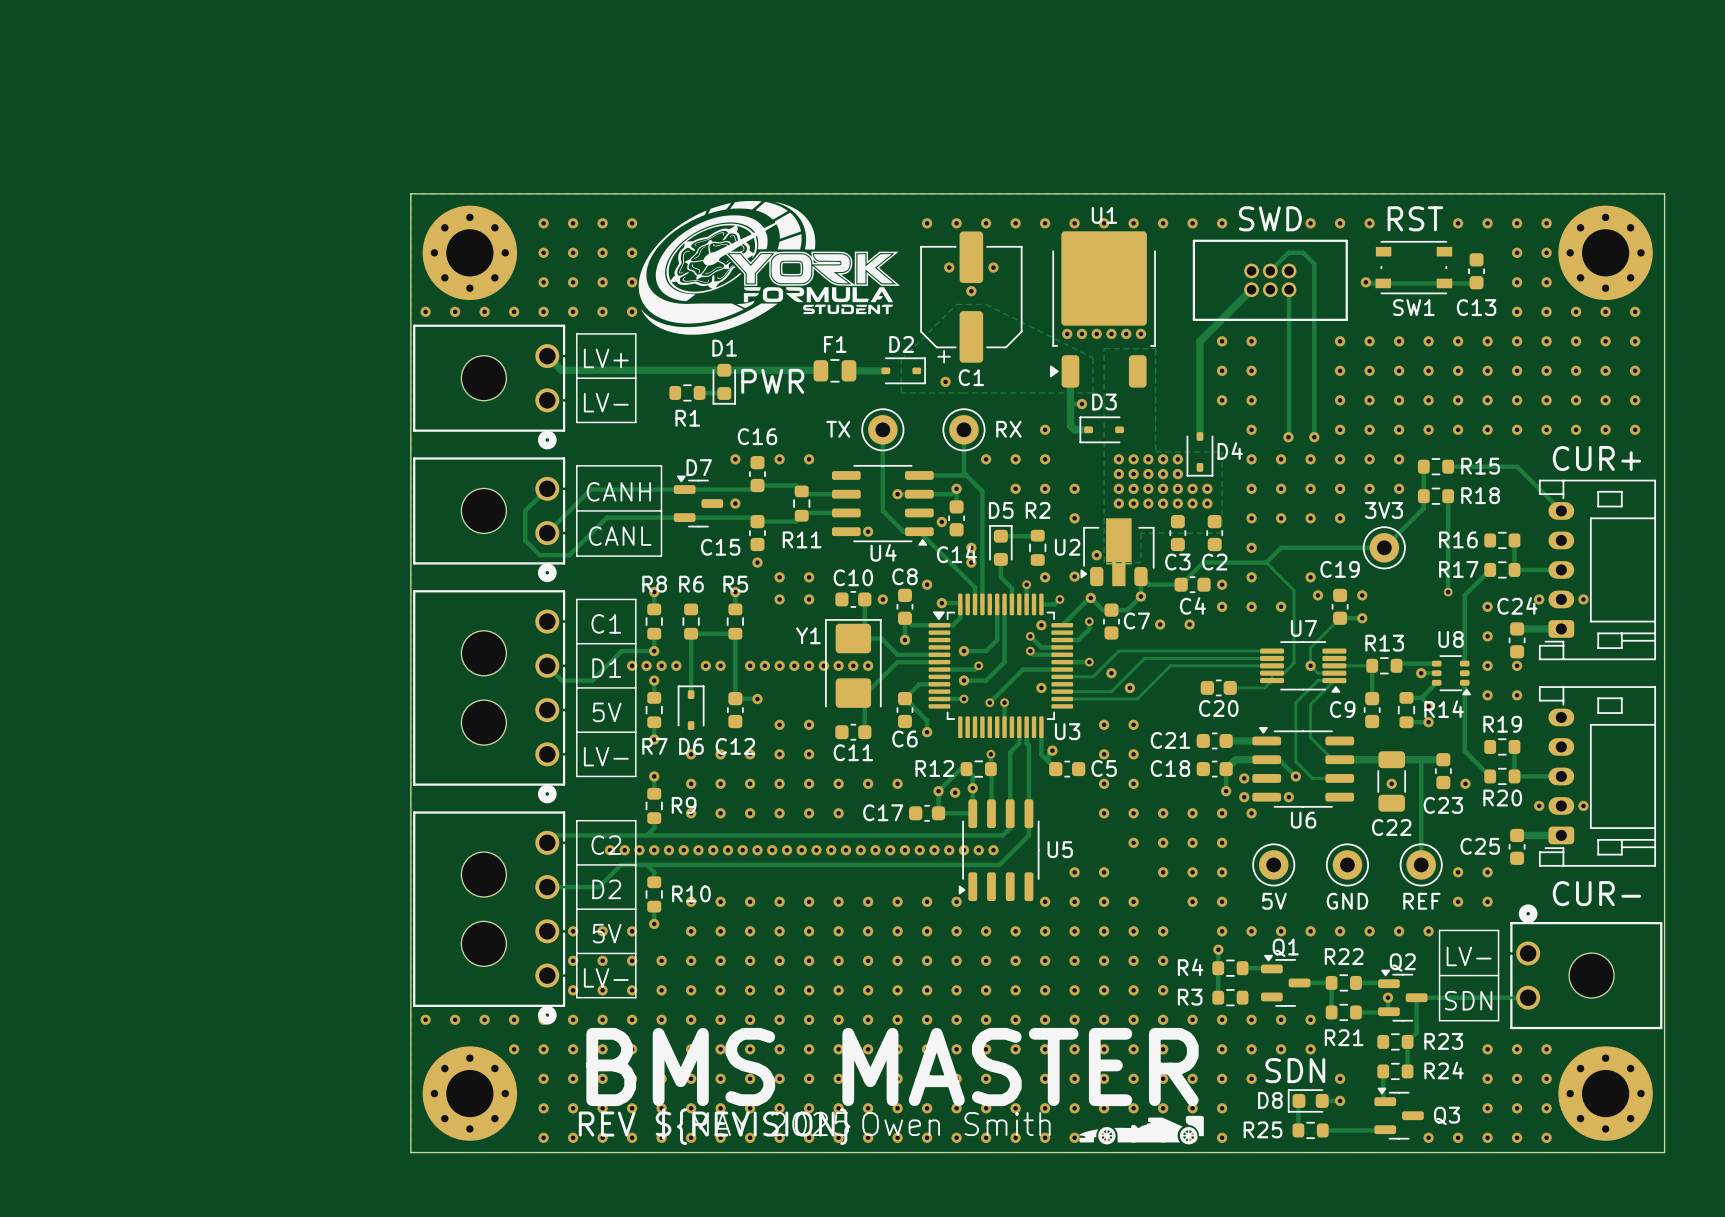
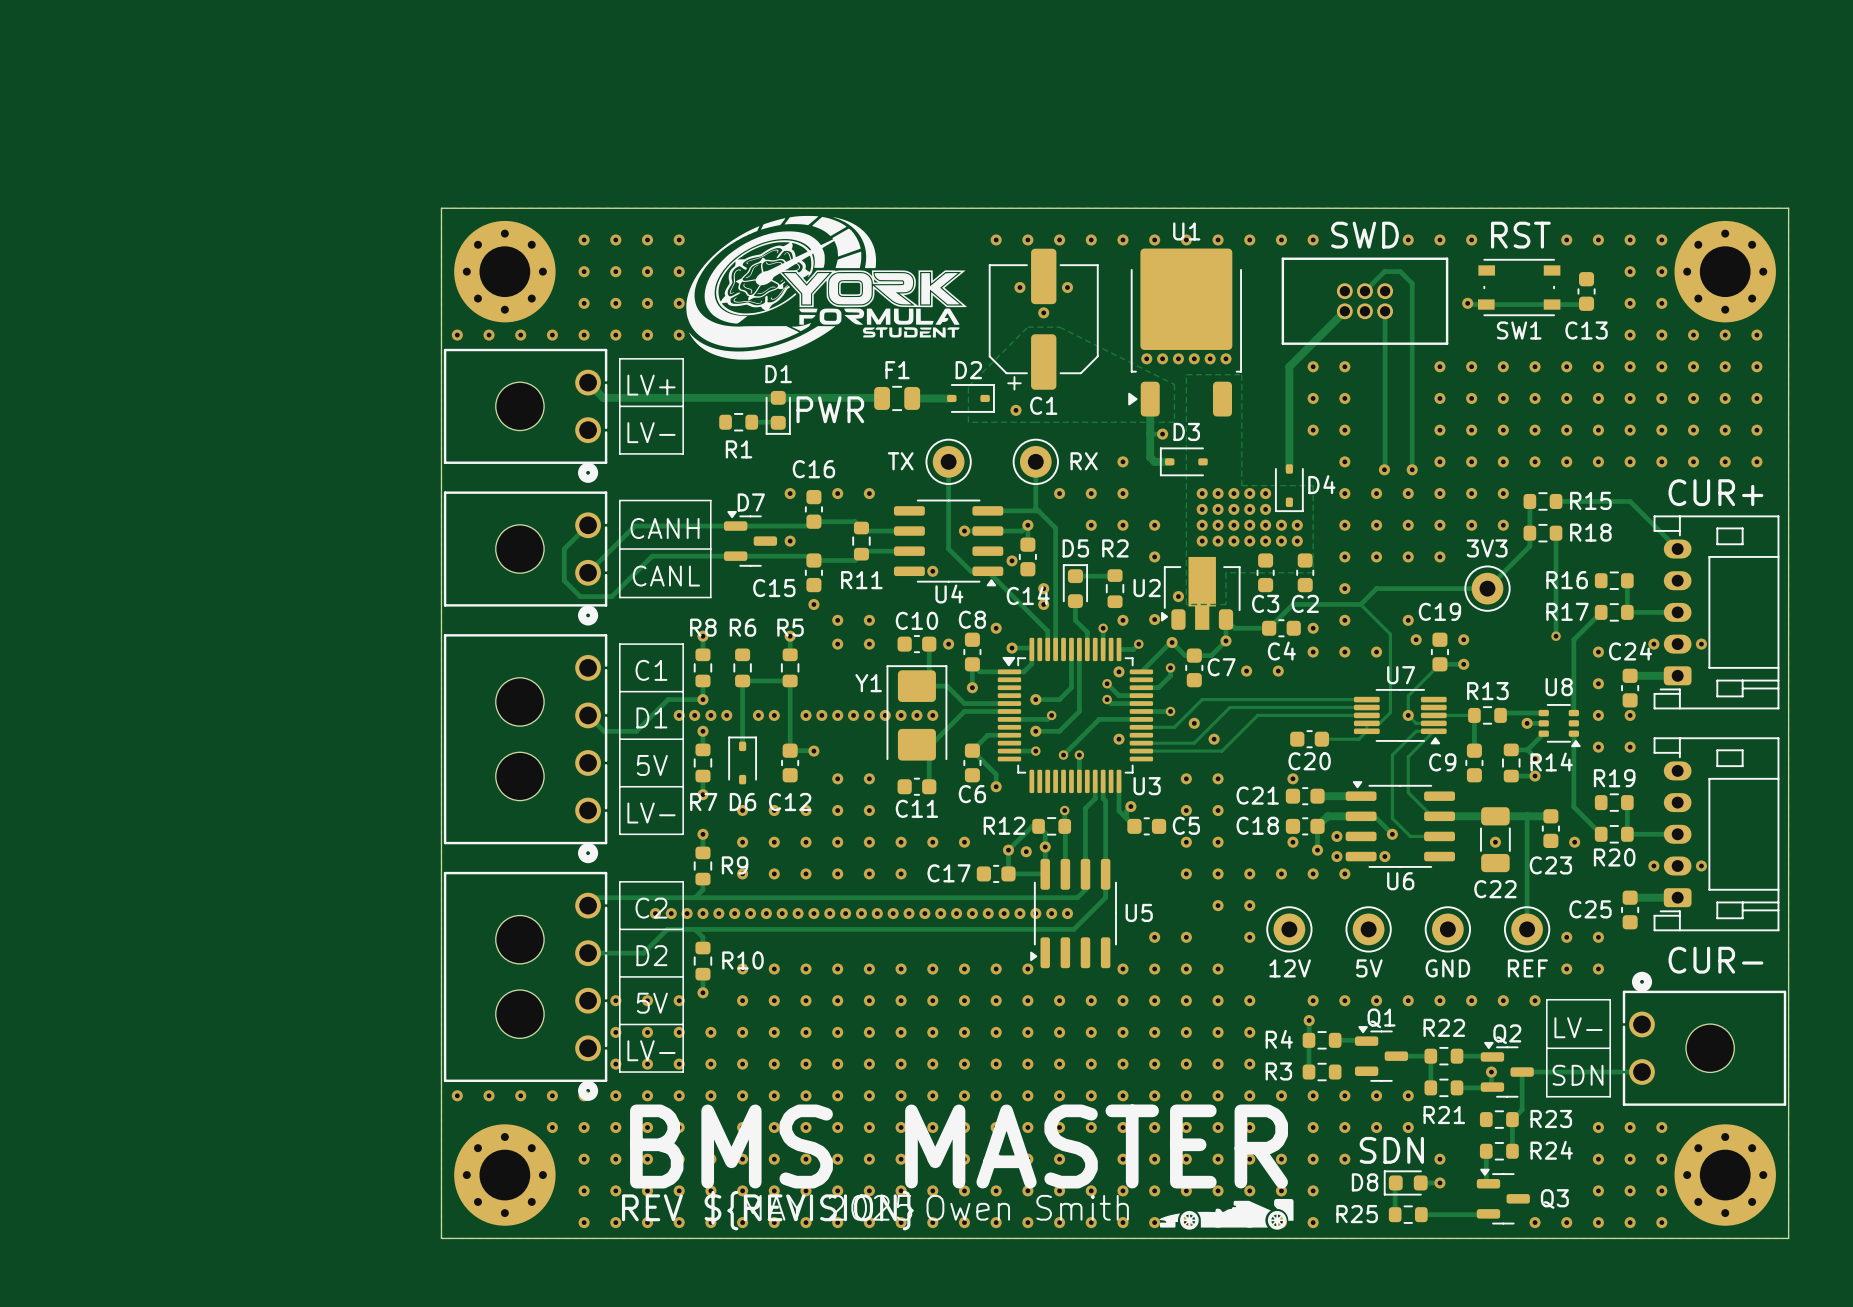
via: none -> (1292, 778)
via: none -> (1292, 842)
via: (1192, 842) -> none
via: (1222, 842) -> none
part: none -> (1289, 929)
via: (1192, 872) -> none
via: (1222, 872) -> none
via: (1192, 901) -> none
text: none -> 12V (1290, 968)
via: (1222, 901) -> none

